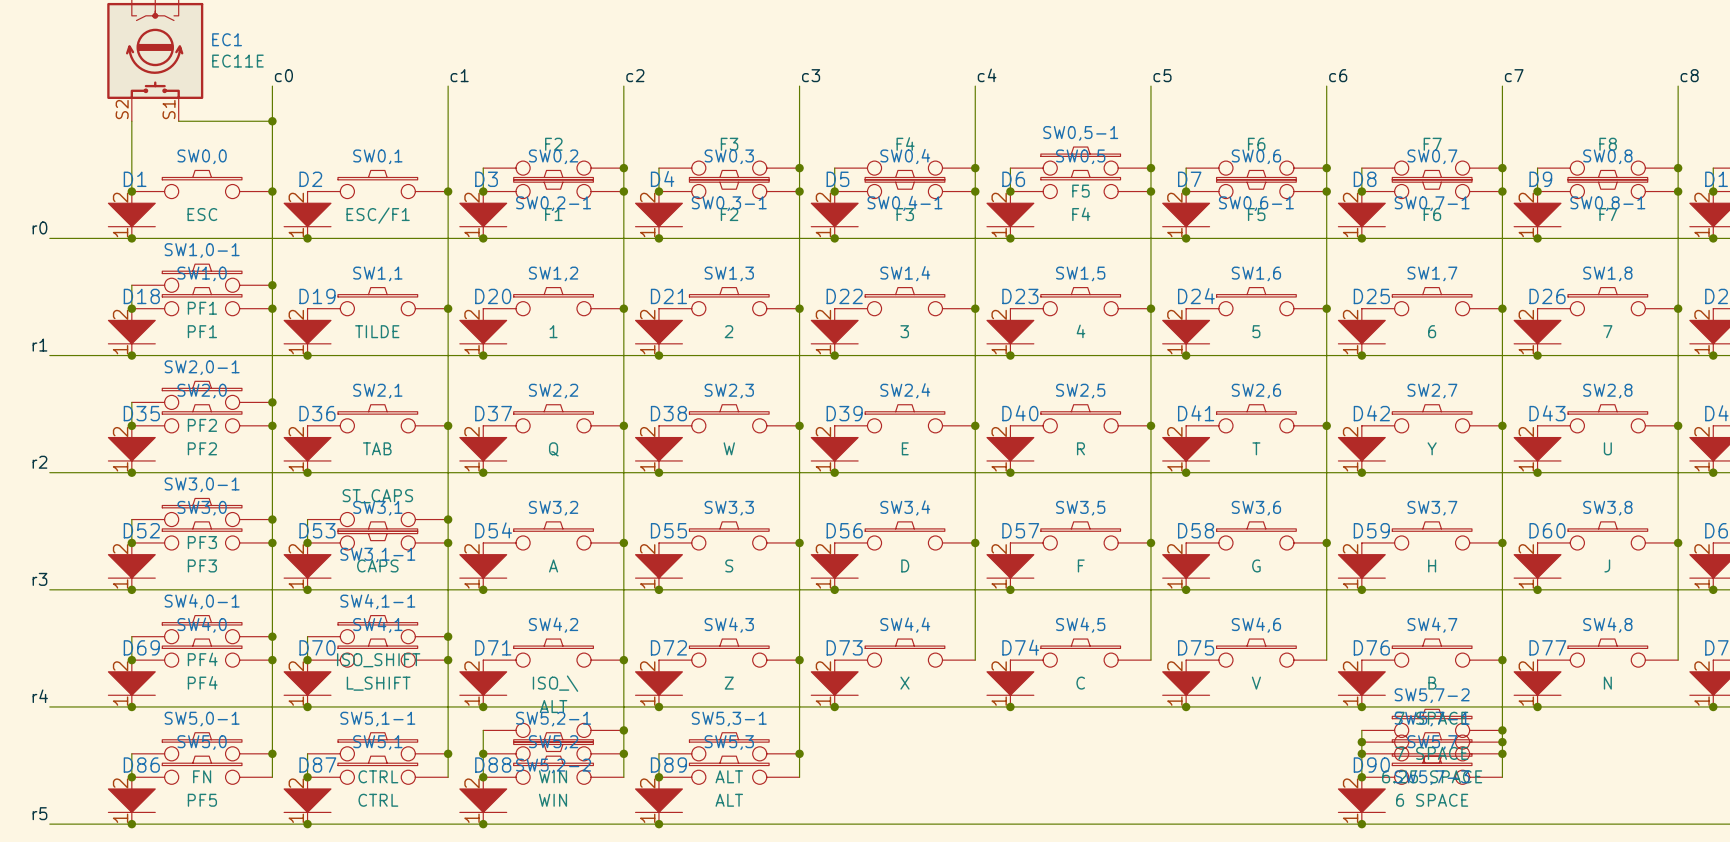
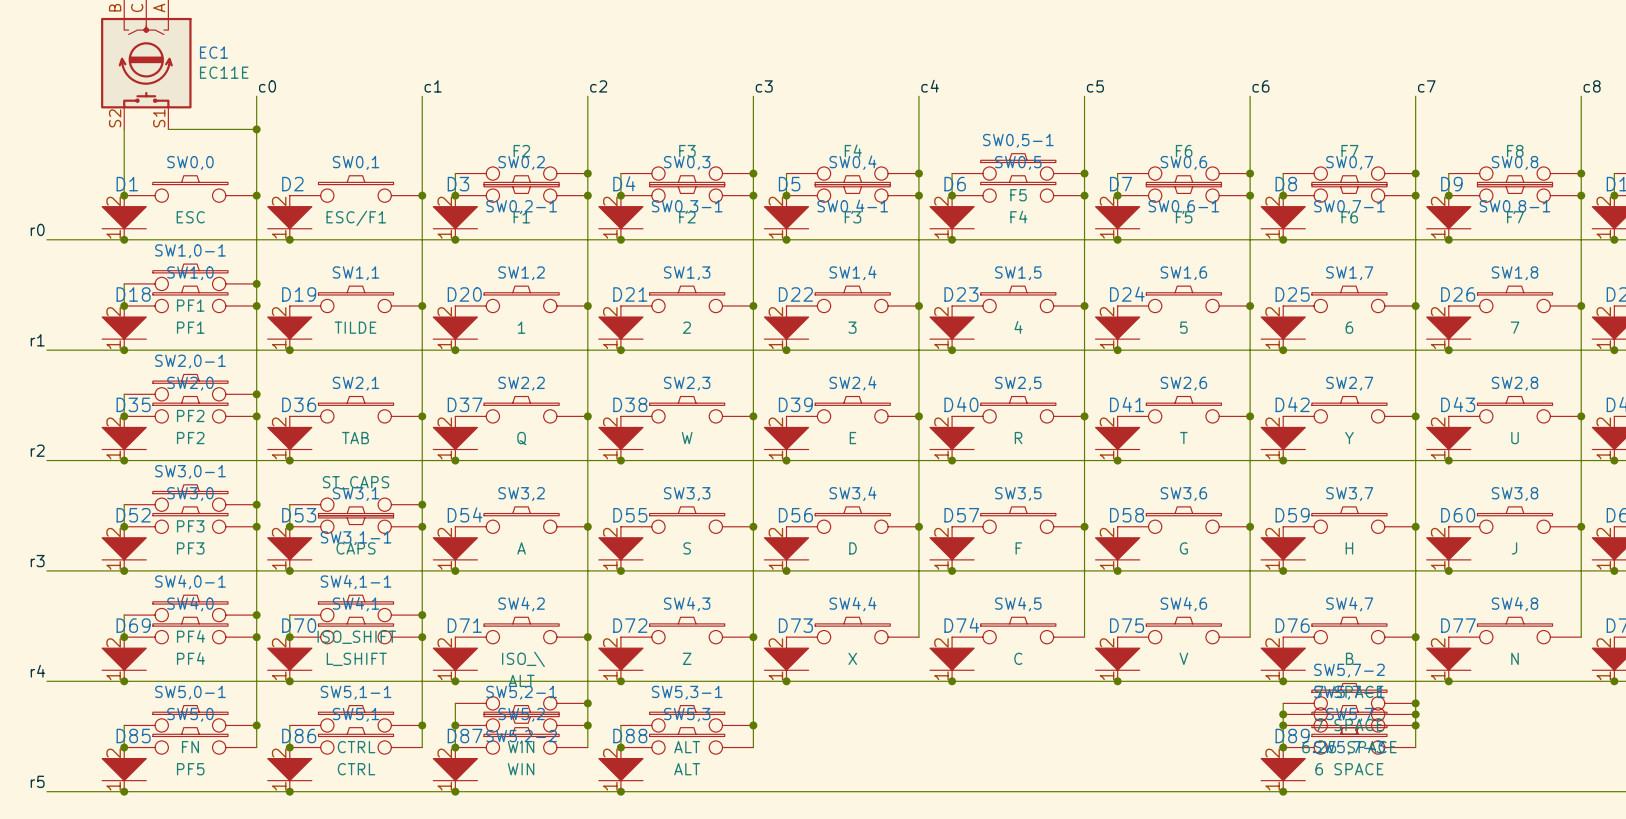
D86 name: D86 (141, 765) -> D85 (133, 736)
D87 name: D87 (317, 765) -> D86 (299, 736)
D88 name: D88 (493, 765) -> D87 (465, 736)
D89 name: D89 (668, 765) -> D88 (630, 736)
D90 name: D90 (1371, 765) -> D89 (1292, 736)

